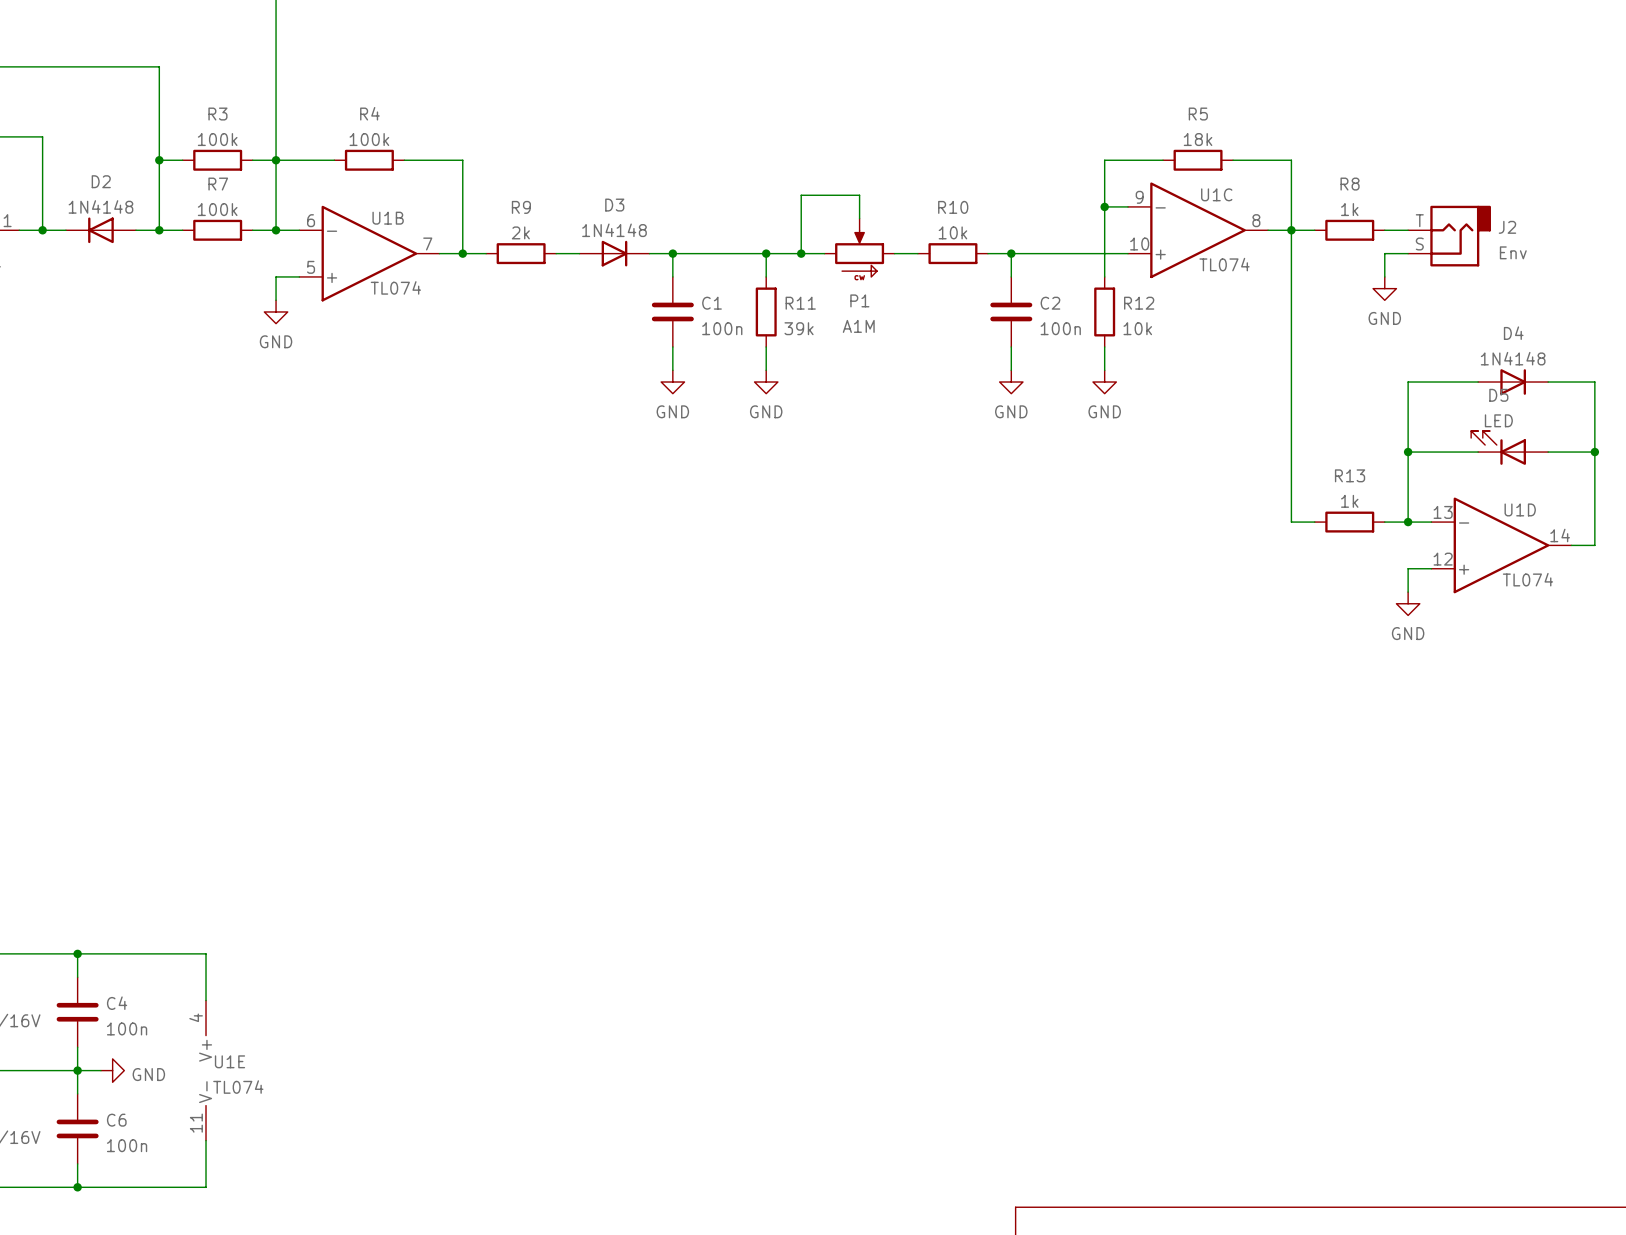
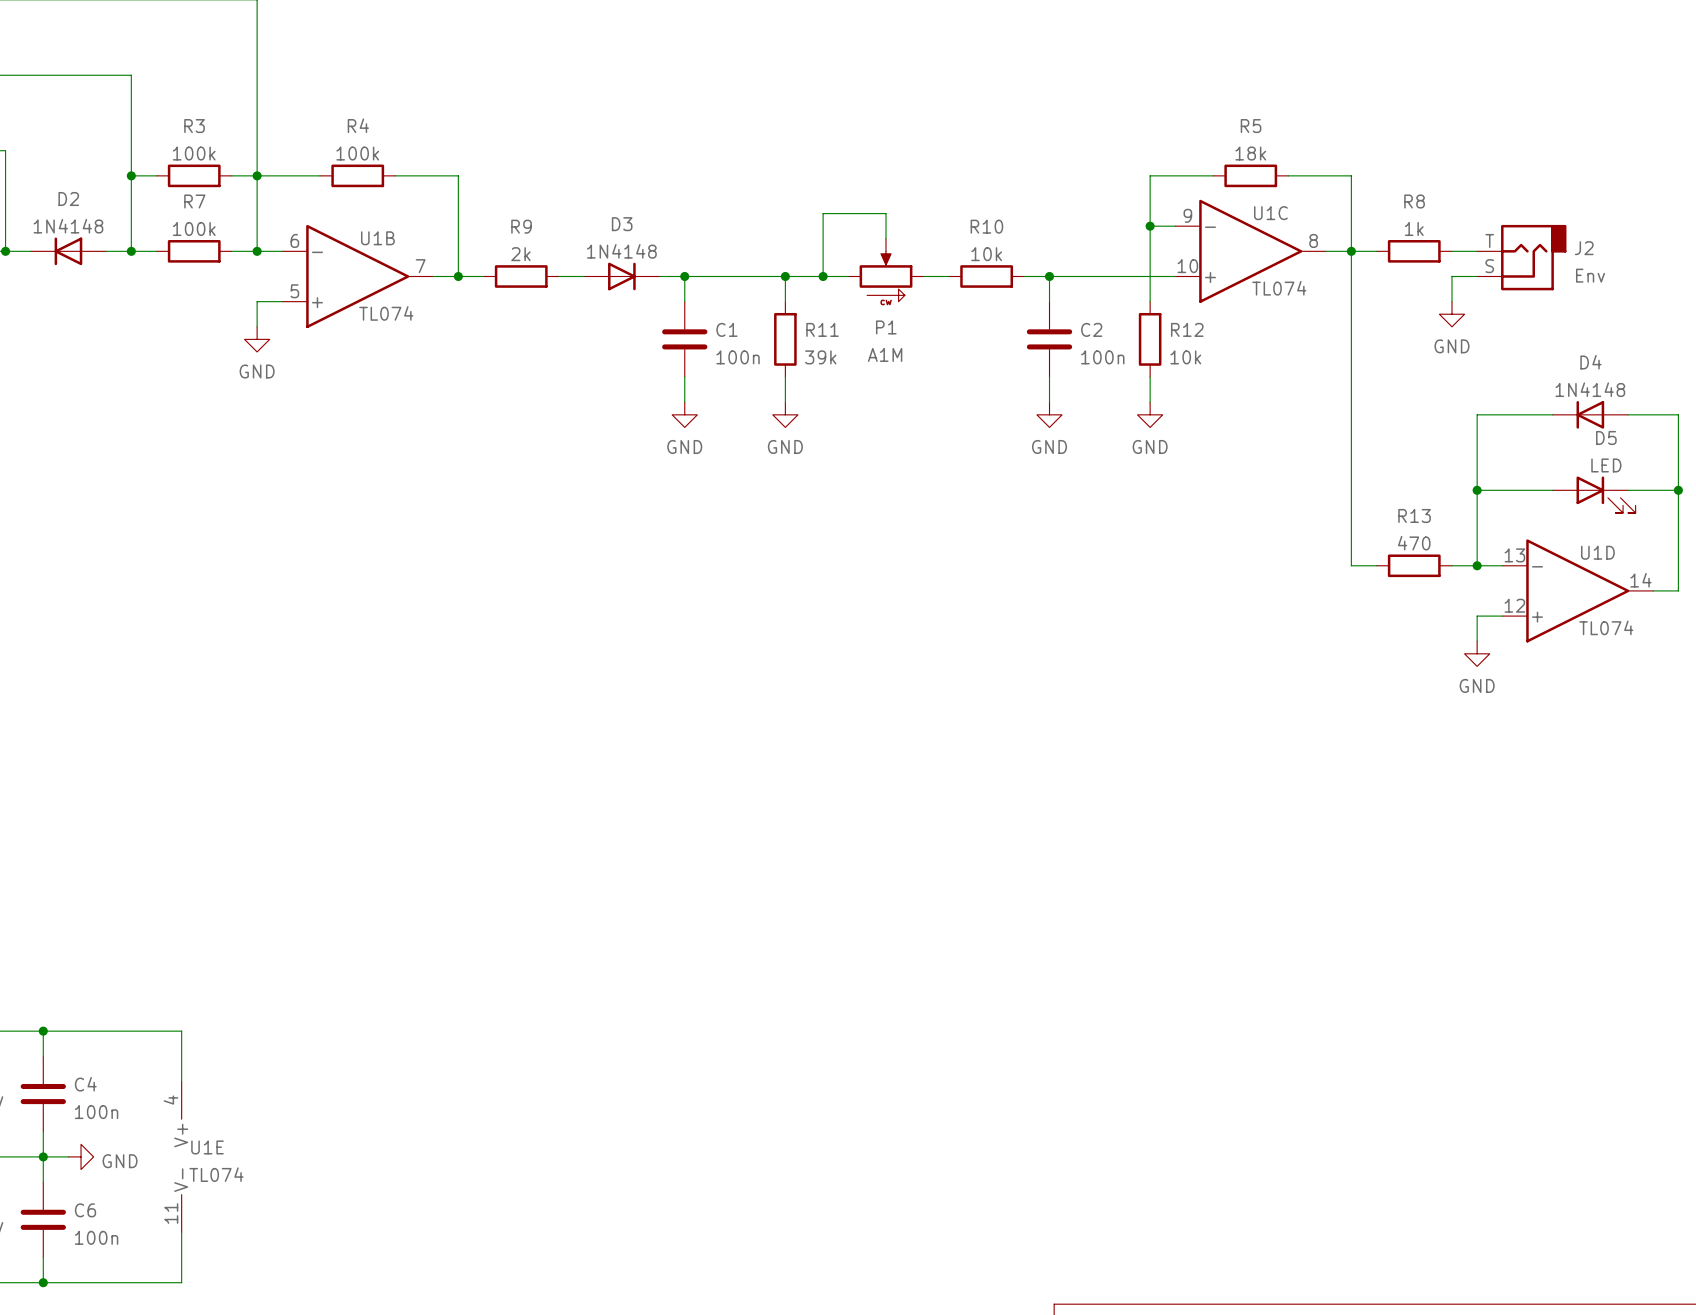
D4 rotation: 0° (1513, 382) -> 180° (1590, 414)
D5 name position: D5 (1498, 395) -> D5 (1606, 437)
D5 value position: LED (1498, 420) -> LED (1606, 465)
D5 rotation: 0° (1498, 447) -> 180° (1606, 494)
R13 value: 1k (1349, 501) -> 470 (1414, 543)

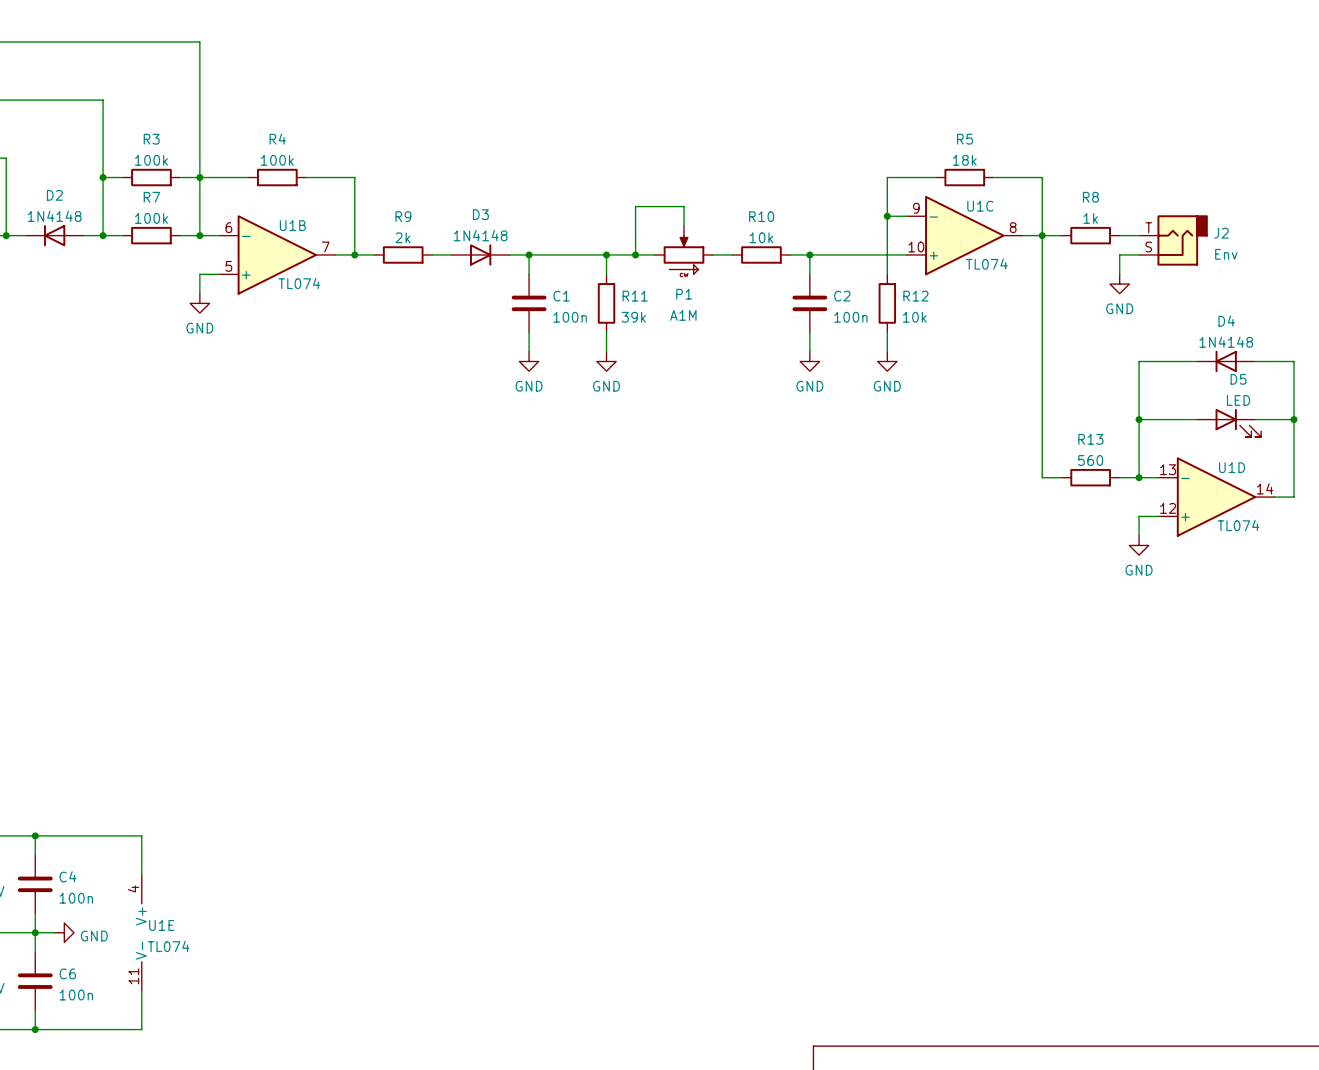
R13 value: 470 (1414, 543) -> 560 (1090, 460)

